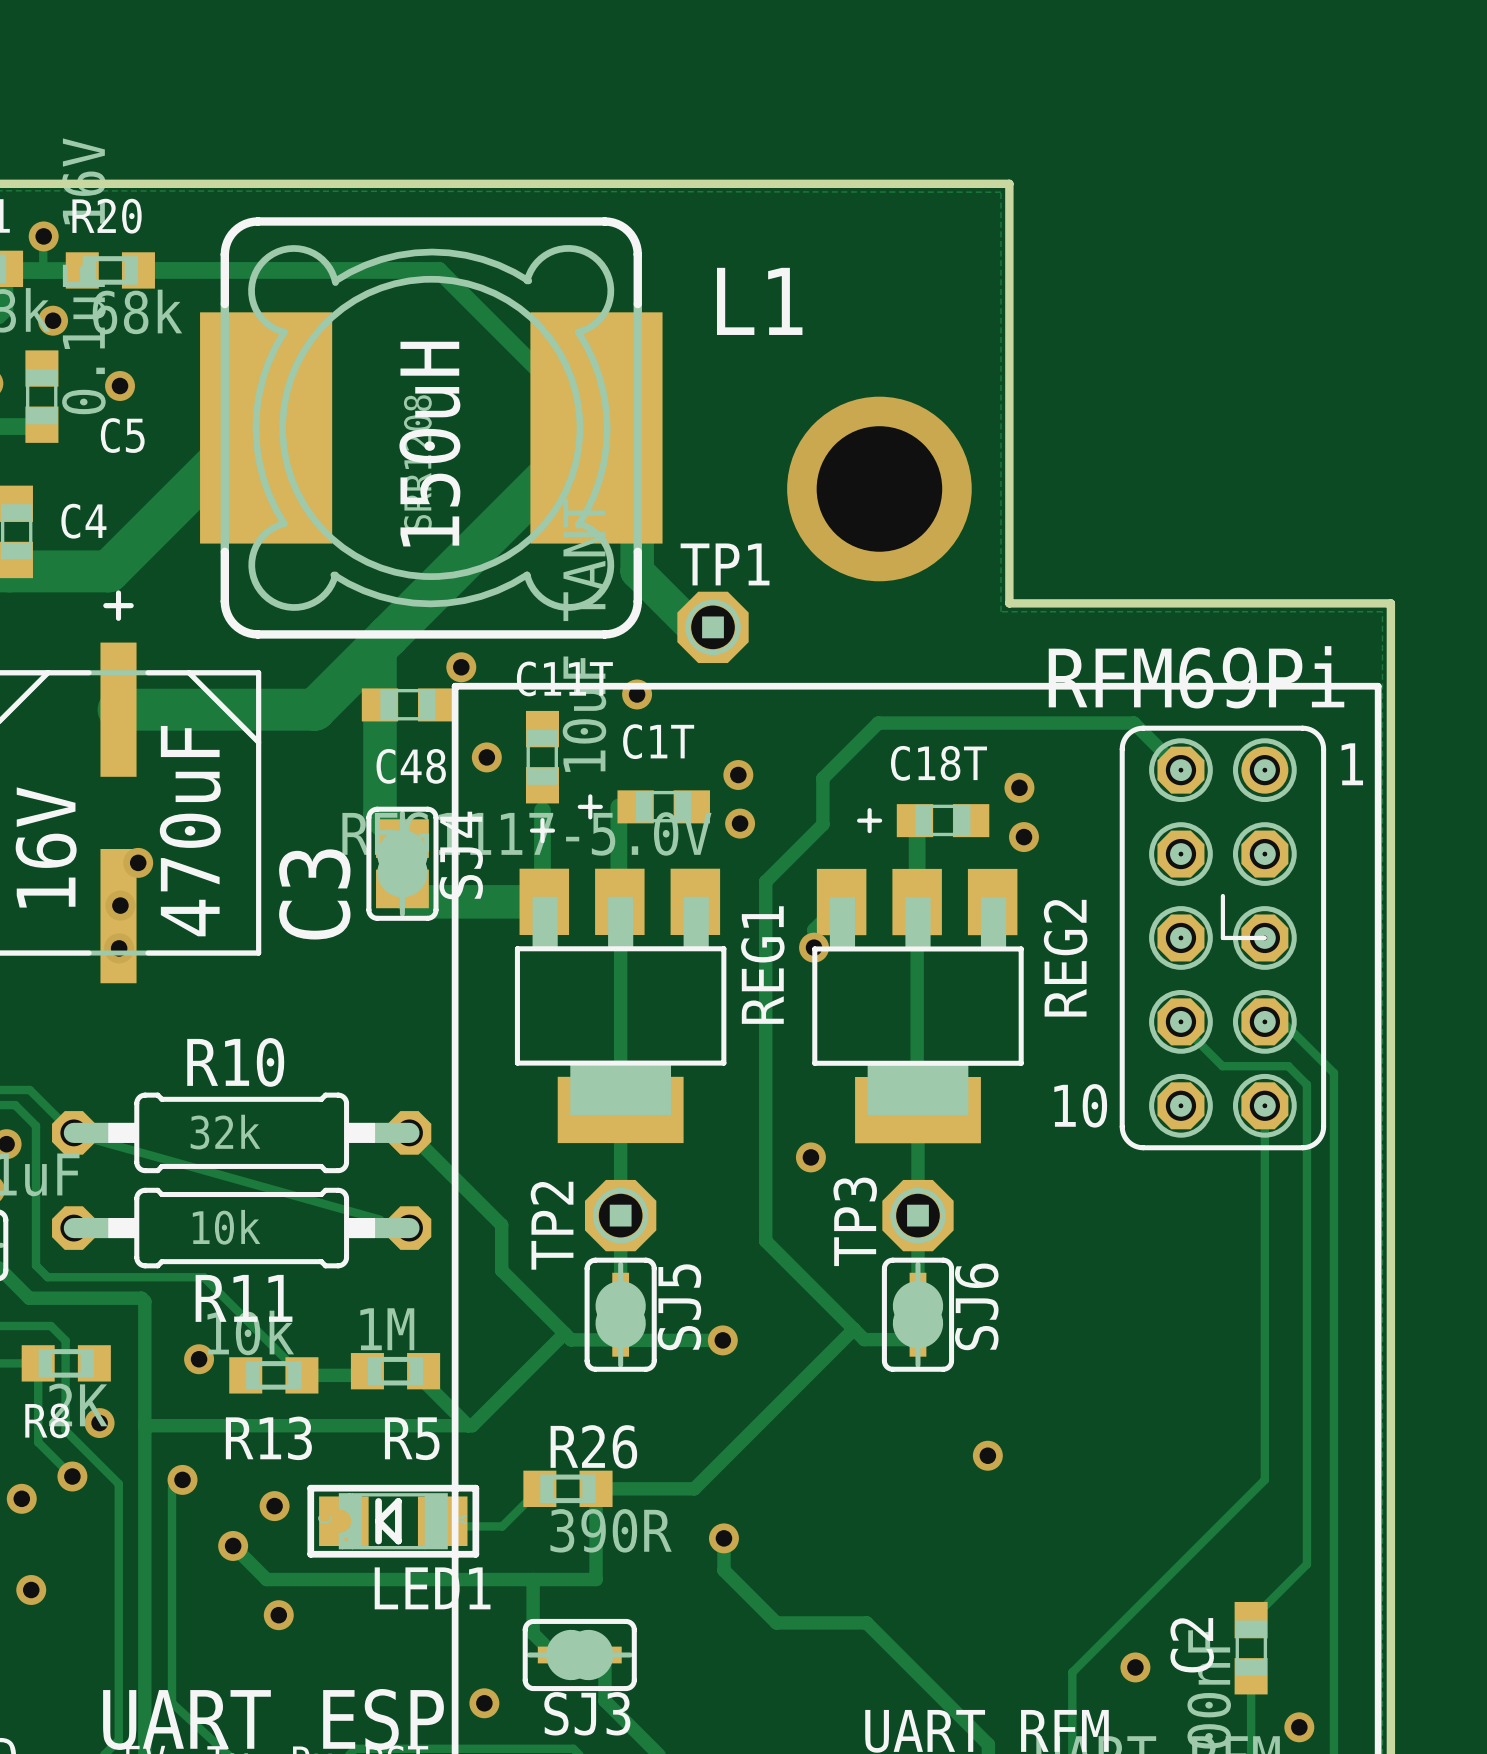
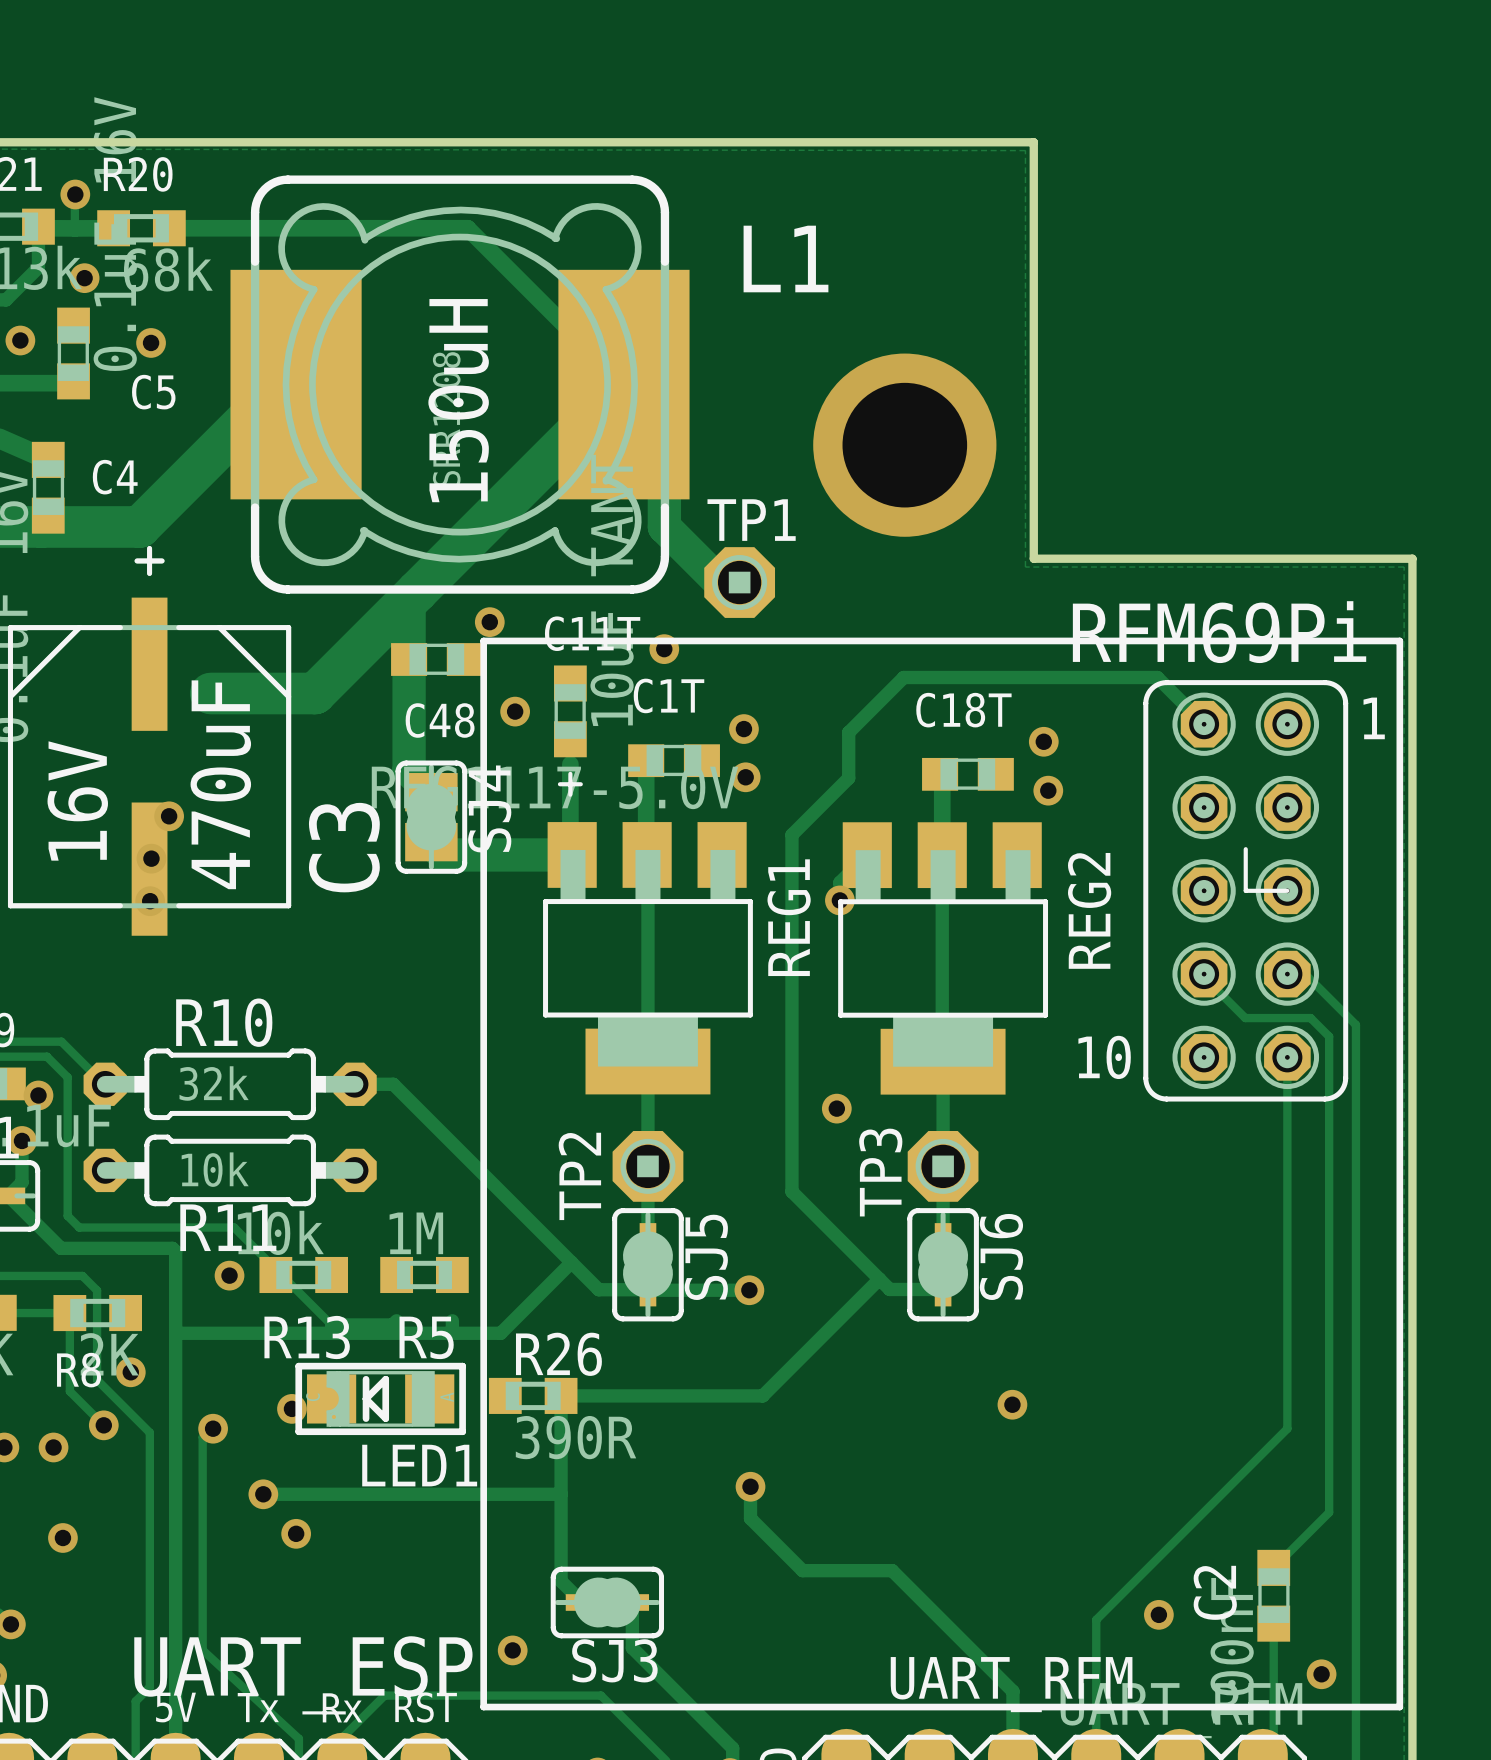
track: (118, 709) (314, 709) -> (210, 693) (315, 693) (344, 664)
via position: (738, 775) -> (743, 729)
C1T footprint: [577, 790, 710, 824] -> [628, 744, 720, 778]
C18T footprint: [857, 804, 990, 838] -> [922, 757, 1014, 791]
via position: (740, 823) -> (745, 777)
R10 footprint: [52, 1092, 432, 1174] -> [83, 1048, 377, 1121]
track: (70, 1132) (380, 1219) -> none
track: (409, 1132) (501, 1225) (501, 1270) -> (355, 1084) (393, 1084) (529, 1220)
R11 footprint: [52, 1187, 432, 1269] -> [83, 1134, 377, 1207]
track: none -> (571, 1262) (500, 1333) (175, 1333)
track: (564, 1333) (472, 1425) (144, 1425) -> none
via position: (199, 1359) -> (229, 1275)
R5 position: (395, 1371) -> (424, 1274)
R13 position: (273, 1375) -> (303, 1274)
track: (426, 1383) (468, 1425) -> none
R13 name position: R13 (268, 1438) -> R13 (307, 1337)
R5 name position: R5 (412, 1438) -> R5 (426, 1337)
track: (736, 1446) (694, 1488) (596, 1488) (596, 1579) (266, 1579) (233, 1545) -> (561, 1494) (263, 1494)
track: none -> (762, 1395) (561, 1395) (561, 1527)
via: none -> (291, 1408)
track: (539, 1488) (502, 1526) (455, 1526) (442, 1521) -> none
R26 position: (567, 1488) -> (533, 1395)
via: (274, 1506) -> none
LED1 position: (393, 1521) -> (380, 1398)
via position: (278, 1615) -> (296, 1533)

